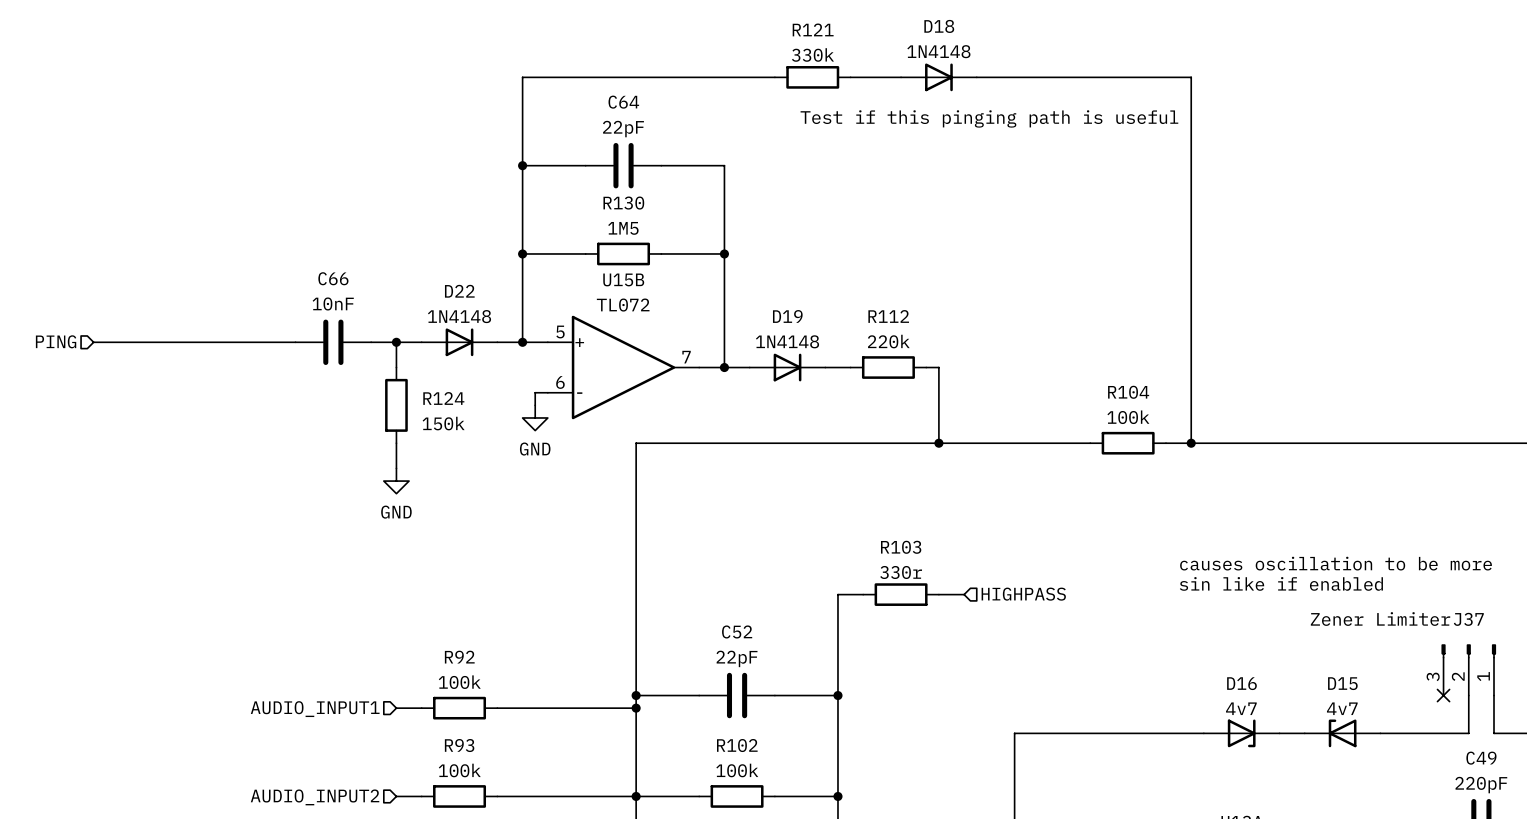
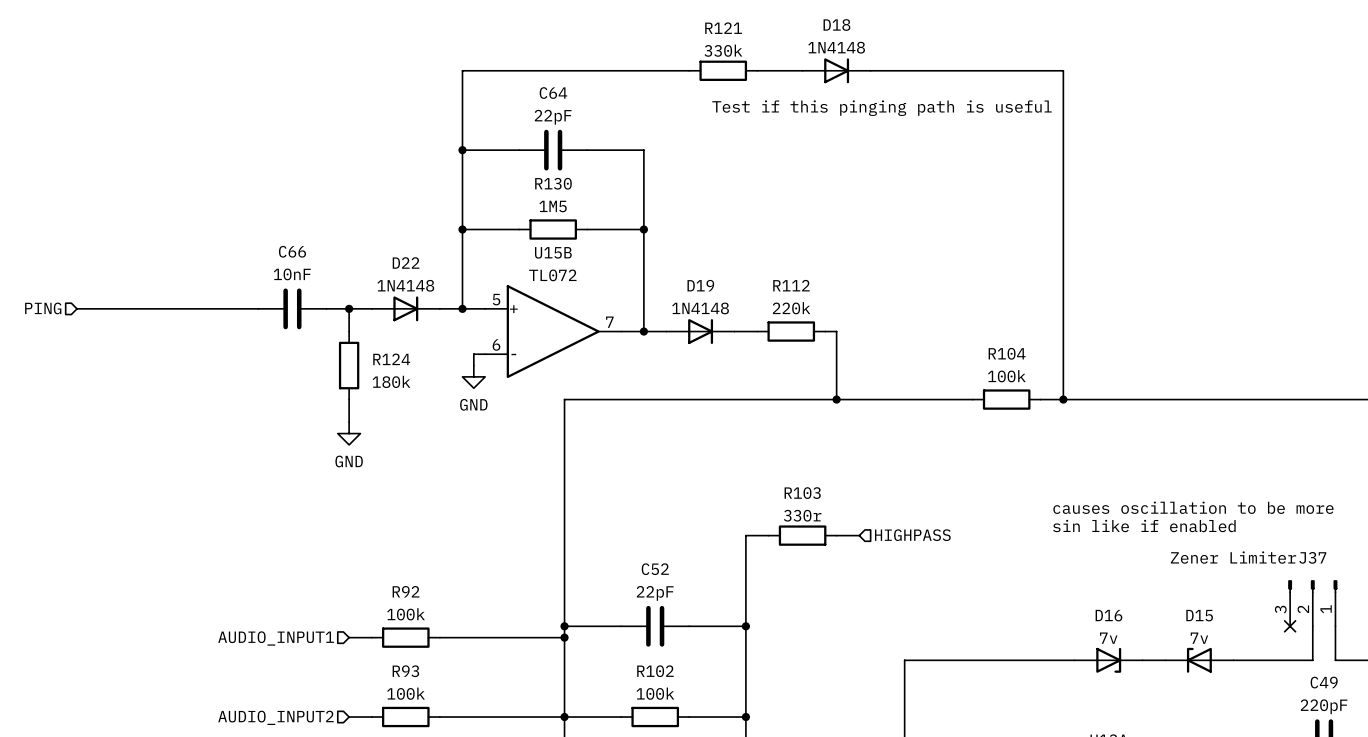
R124 value: 150k (443, 423) -> 180k (391, 381)
D16 value: 4v7 (1241, 708) -> 7v (1108, 638)
D15 value: 4v7 (1342, 708) -> 7v (1199, 638)

